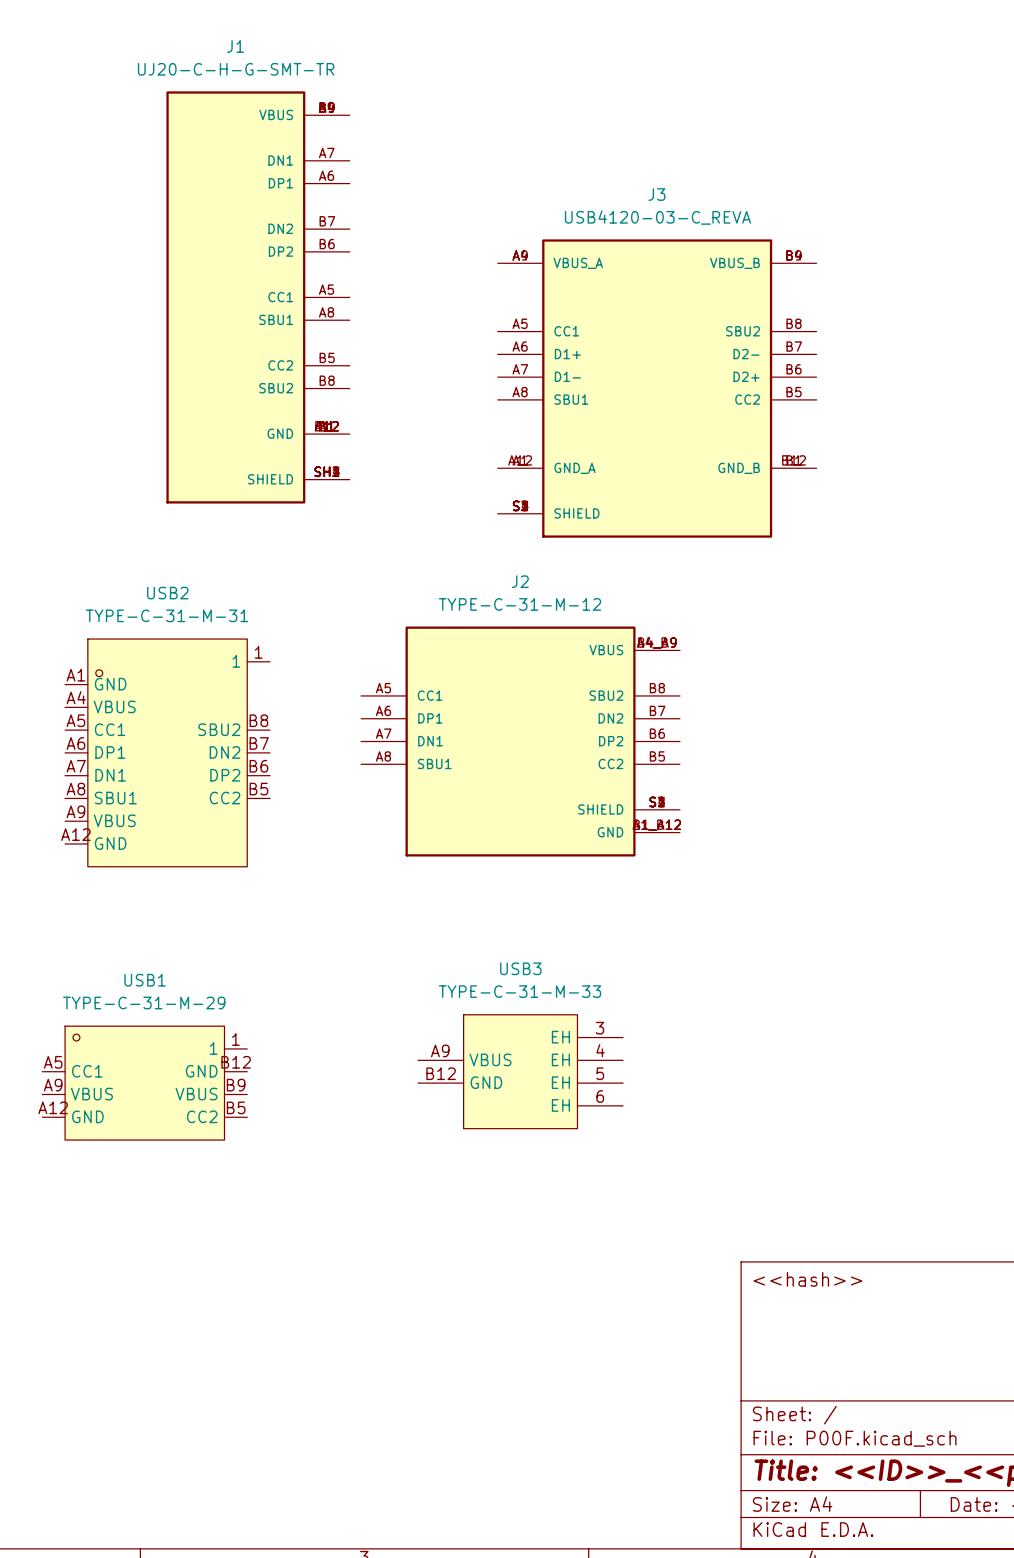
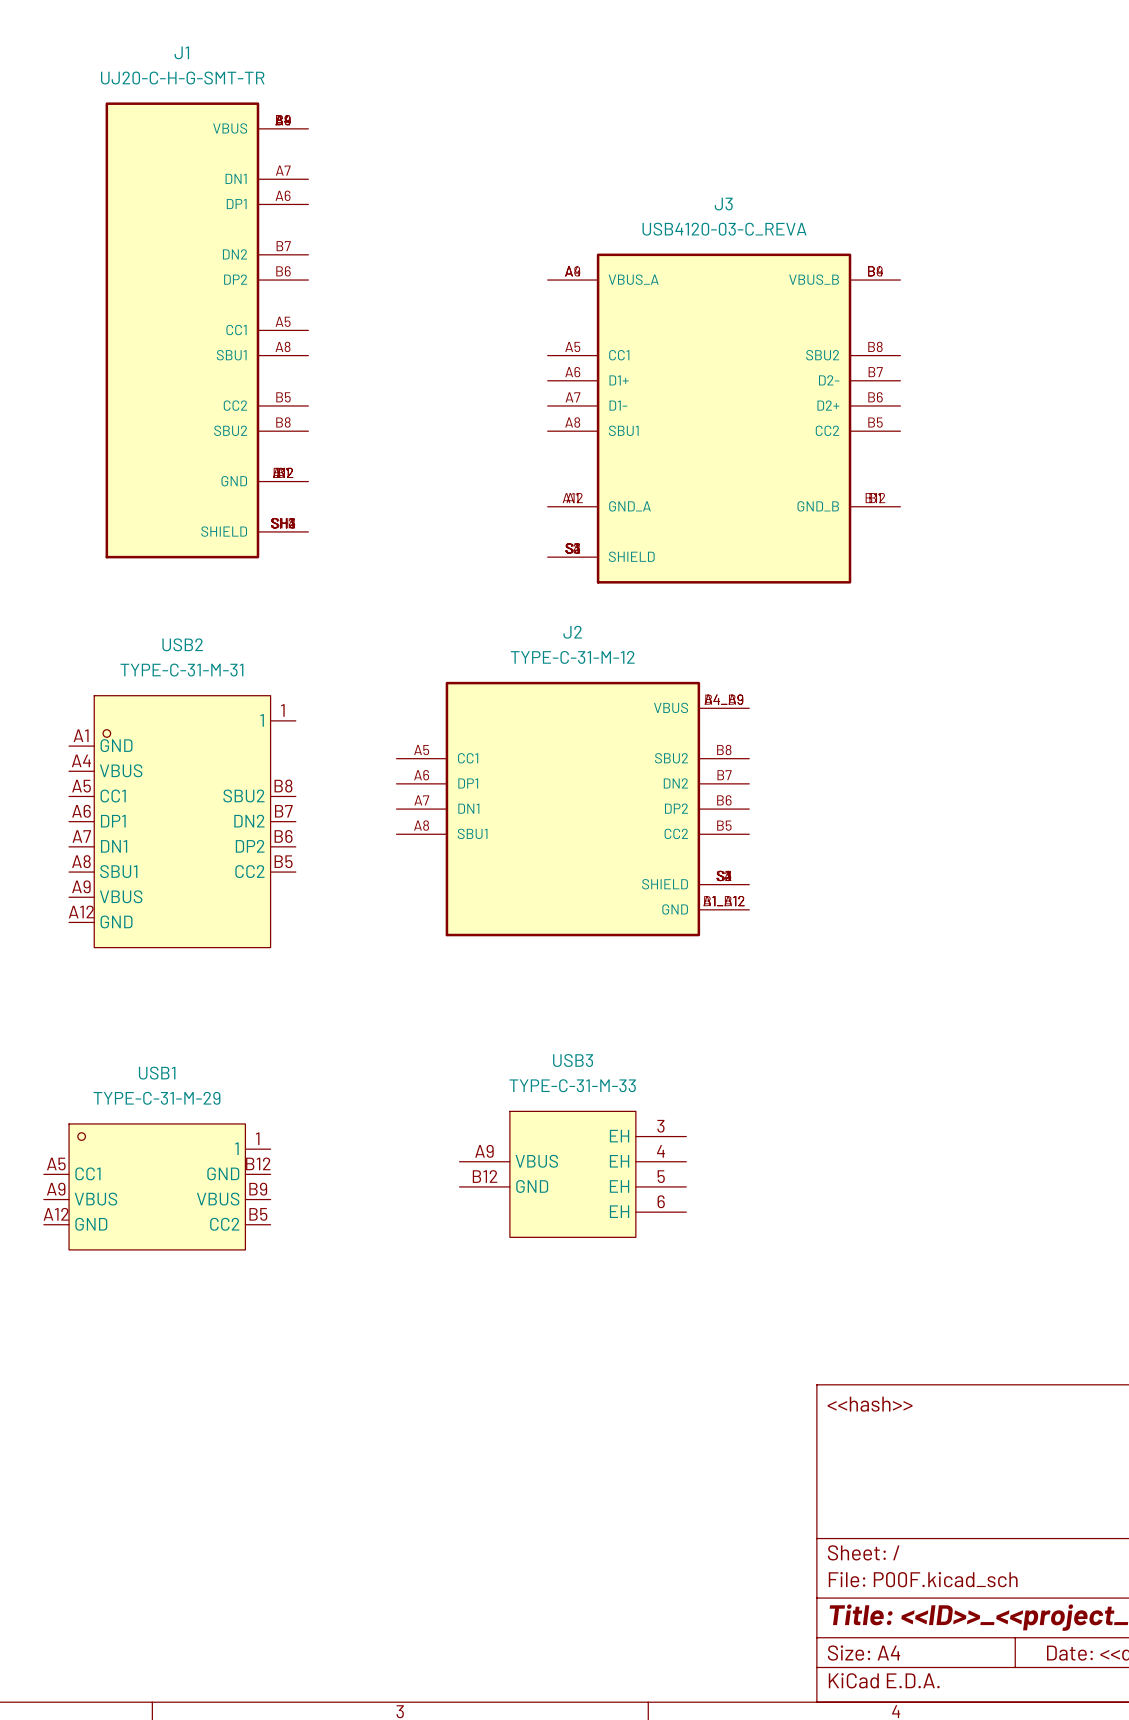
J1 position: (258, 297) -> (206, 330)

